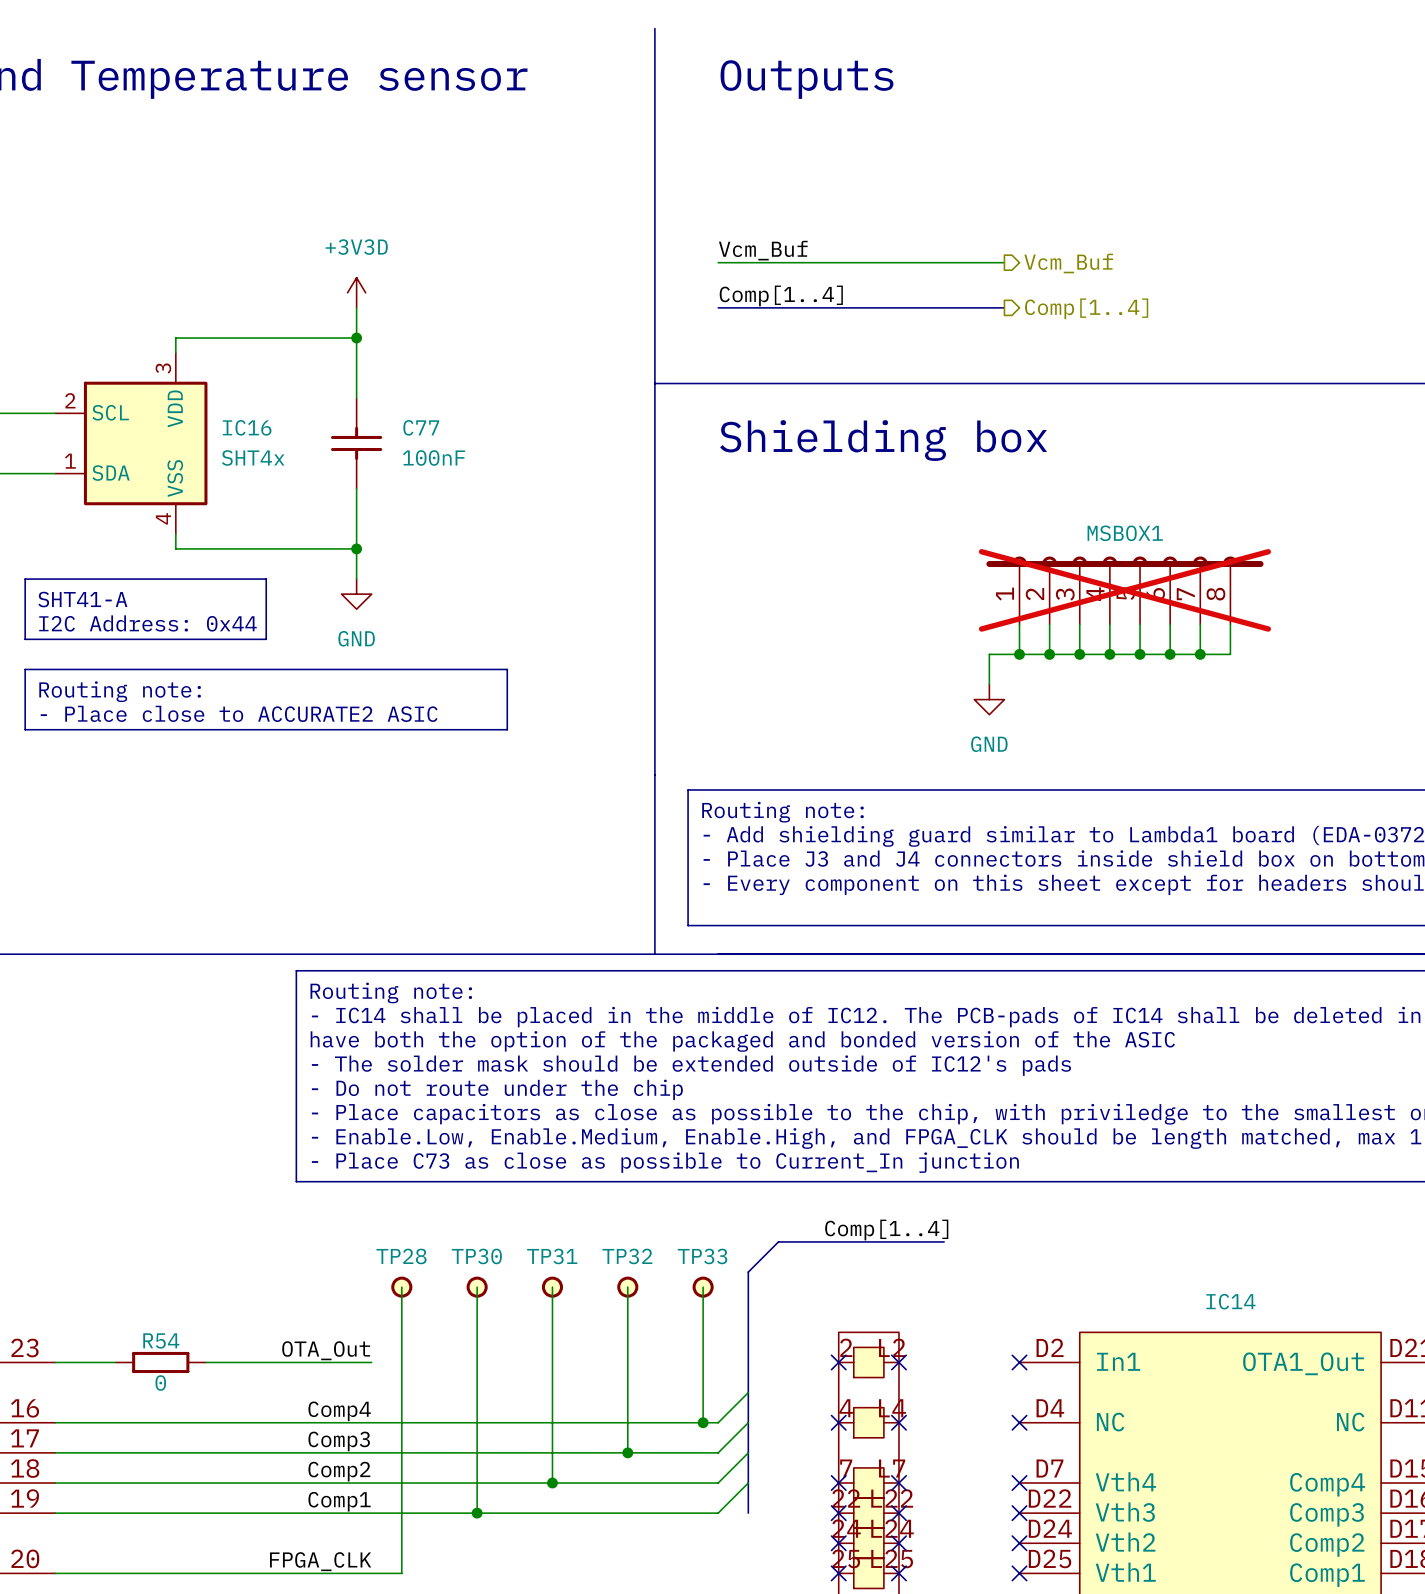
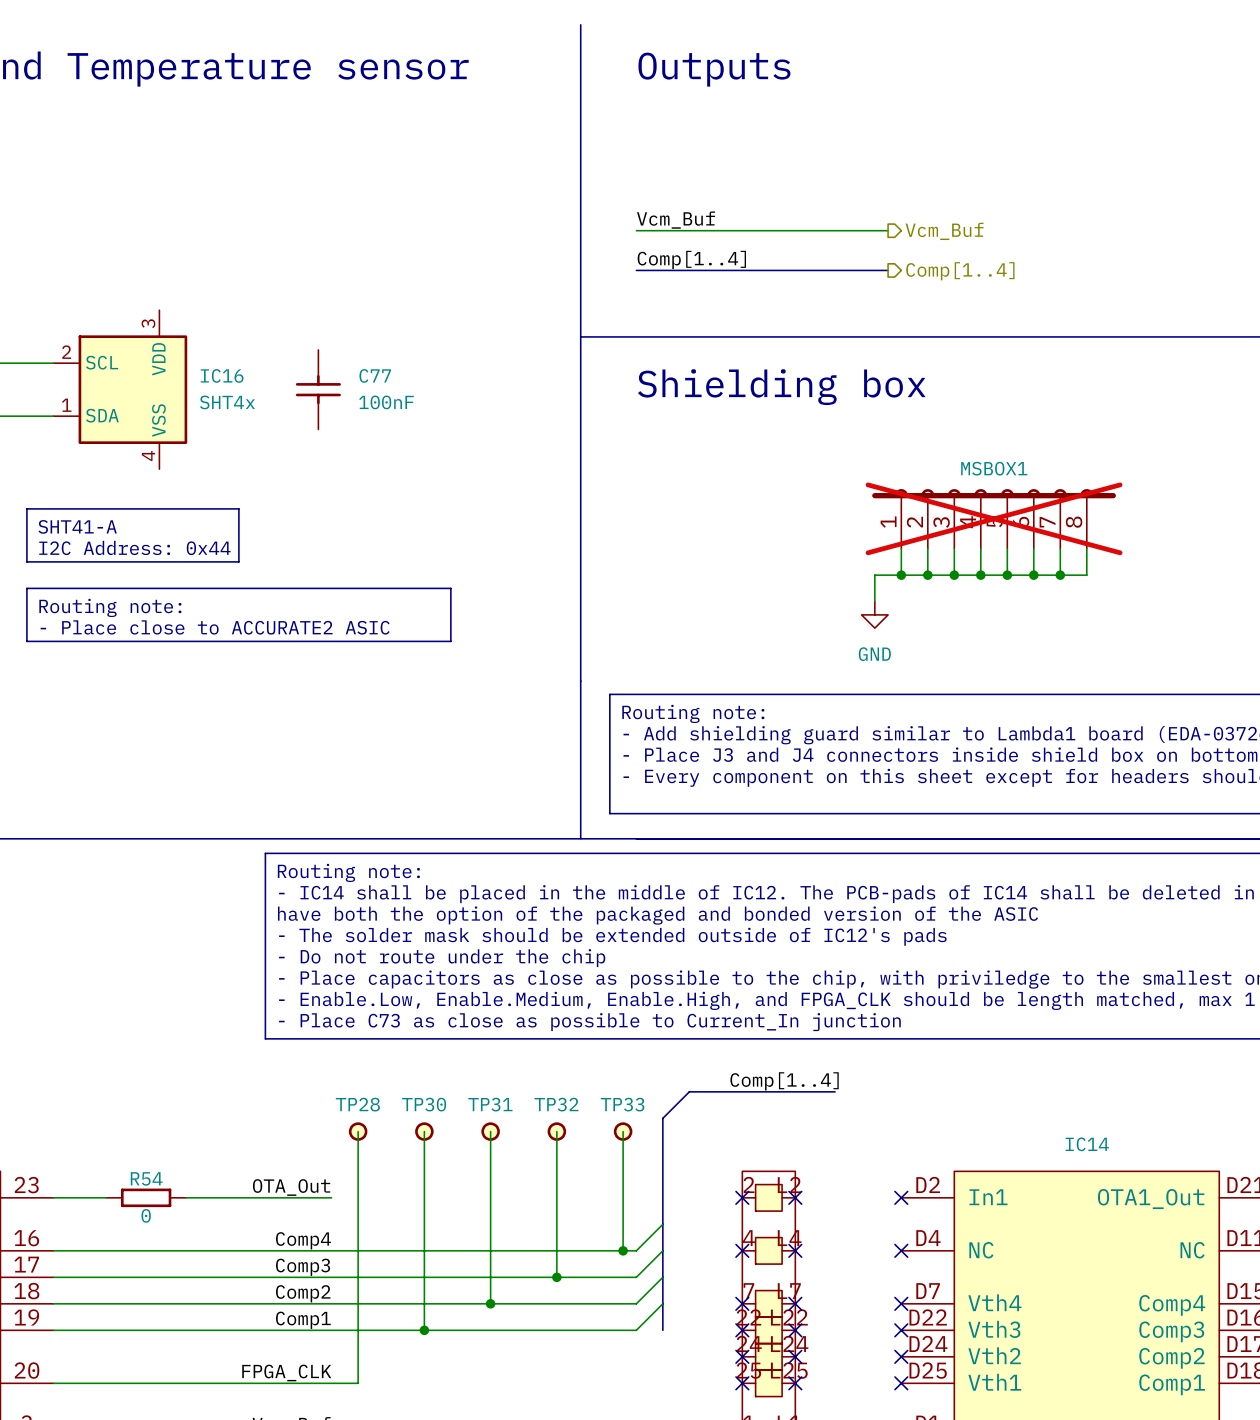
power symbol: +3V3D (356, 292) -> none
wire: (356, 307) (356, 398) -> none
wire: (356, 338) (175, 338) (175, 353) -> none
junction: (356, 338) -> none
wire: (356, 488) (356, 579) -> none
wire: (175, 533) (175, 548) (356, 548) -> none
junction: (356, 548) -> none
power symbol: GND (356, 594) -> none

